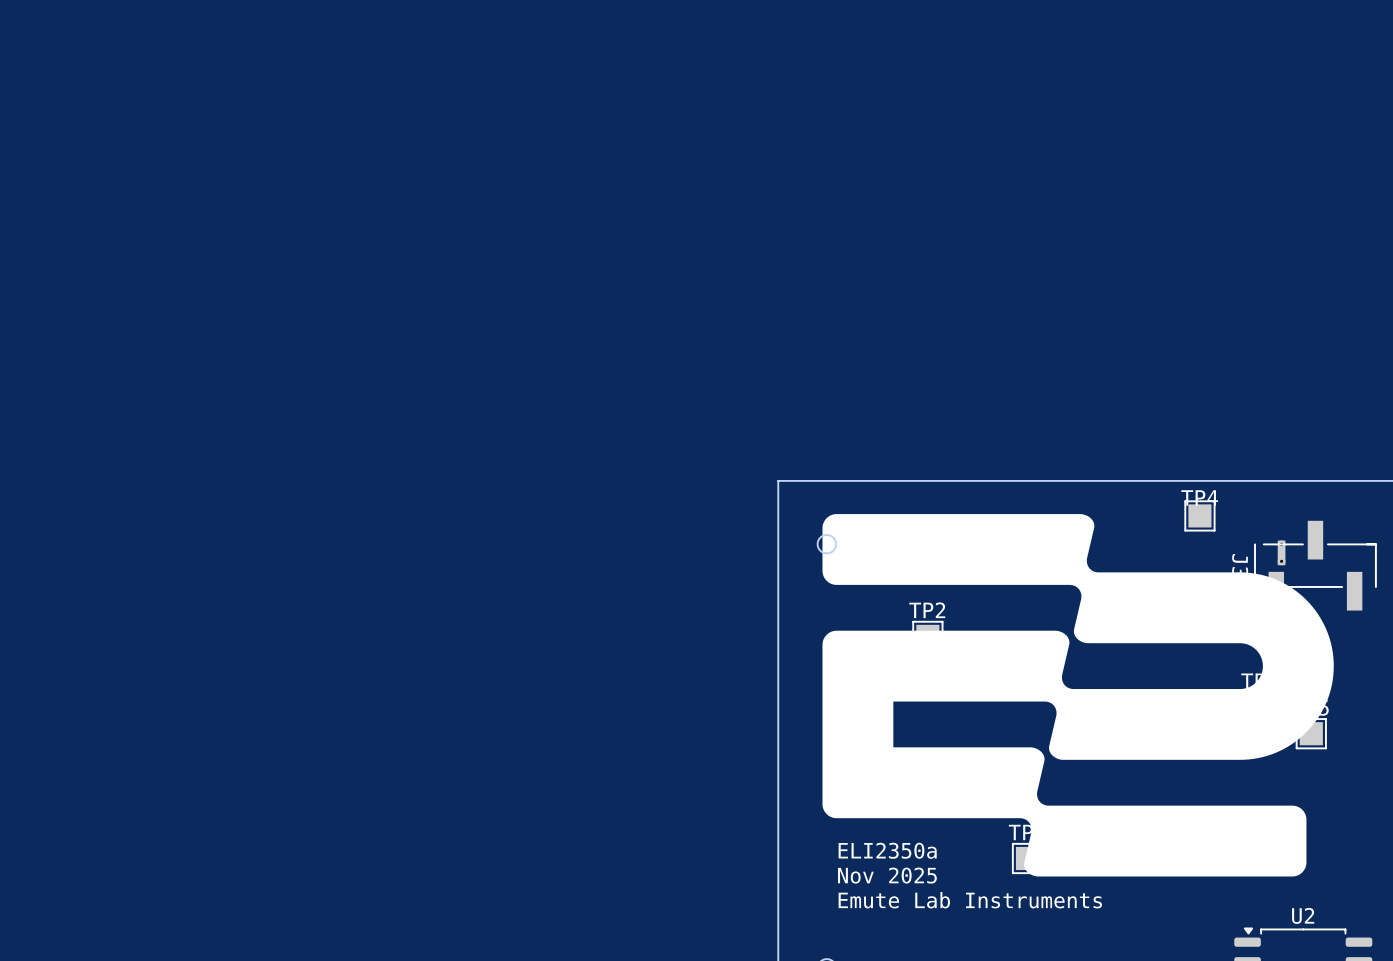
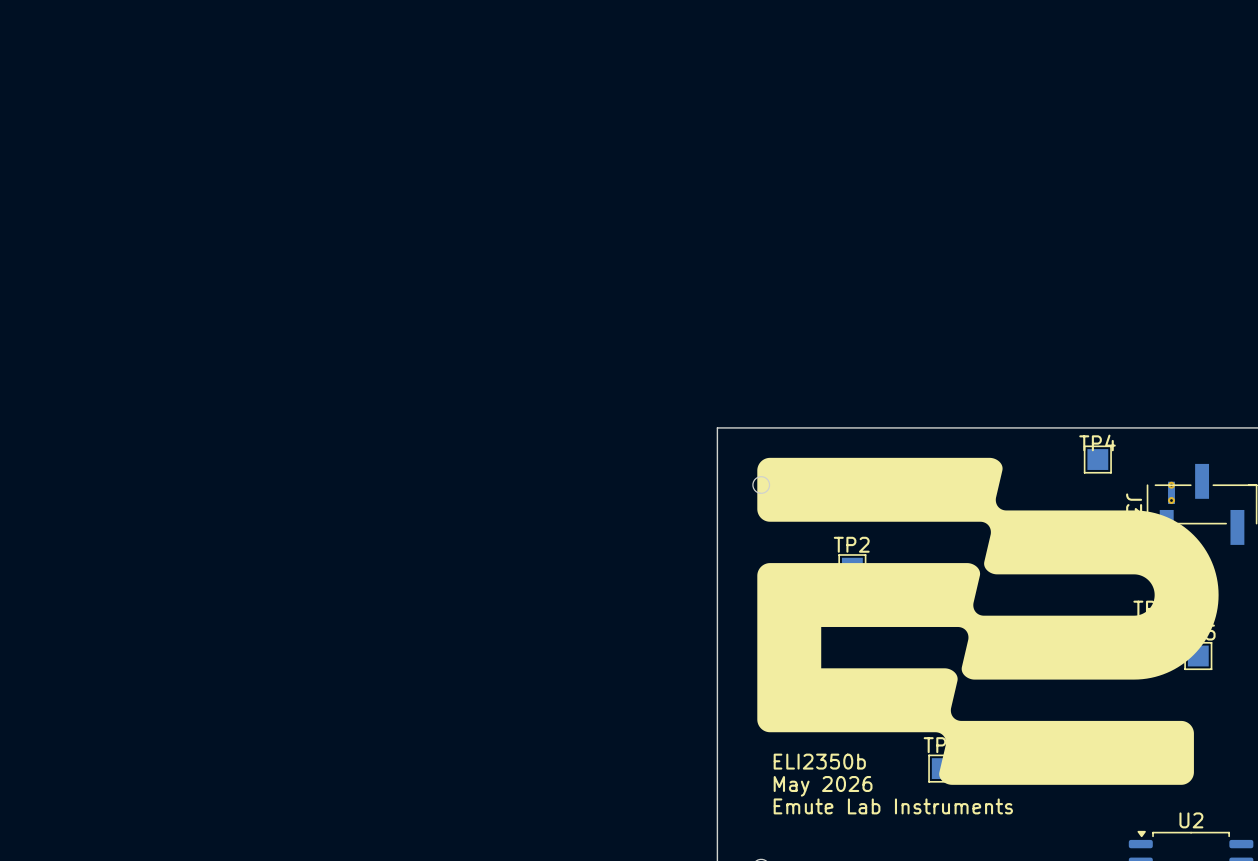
text: ELI2350a (887, 850) -> ELI2350b (819, 761)
text: Nov 2025 (887, 875) -> May 2026 (823, 786)

